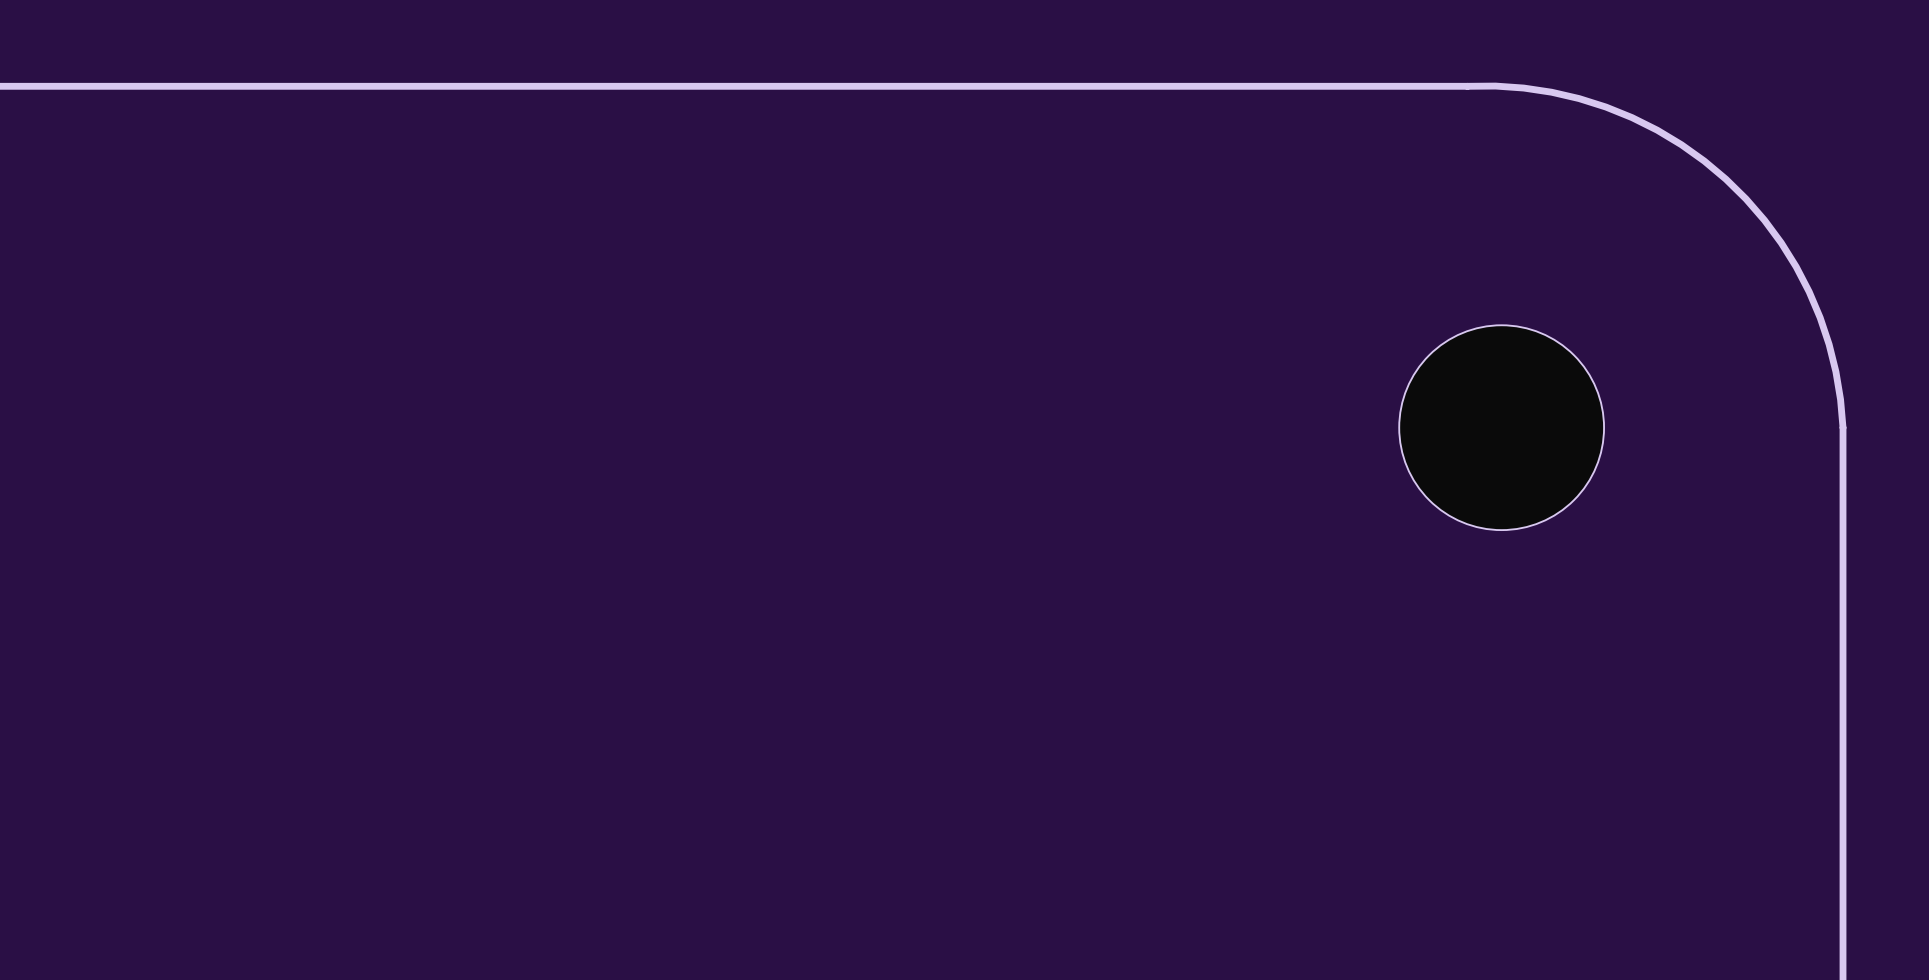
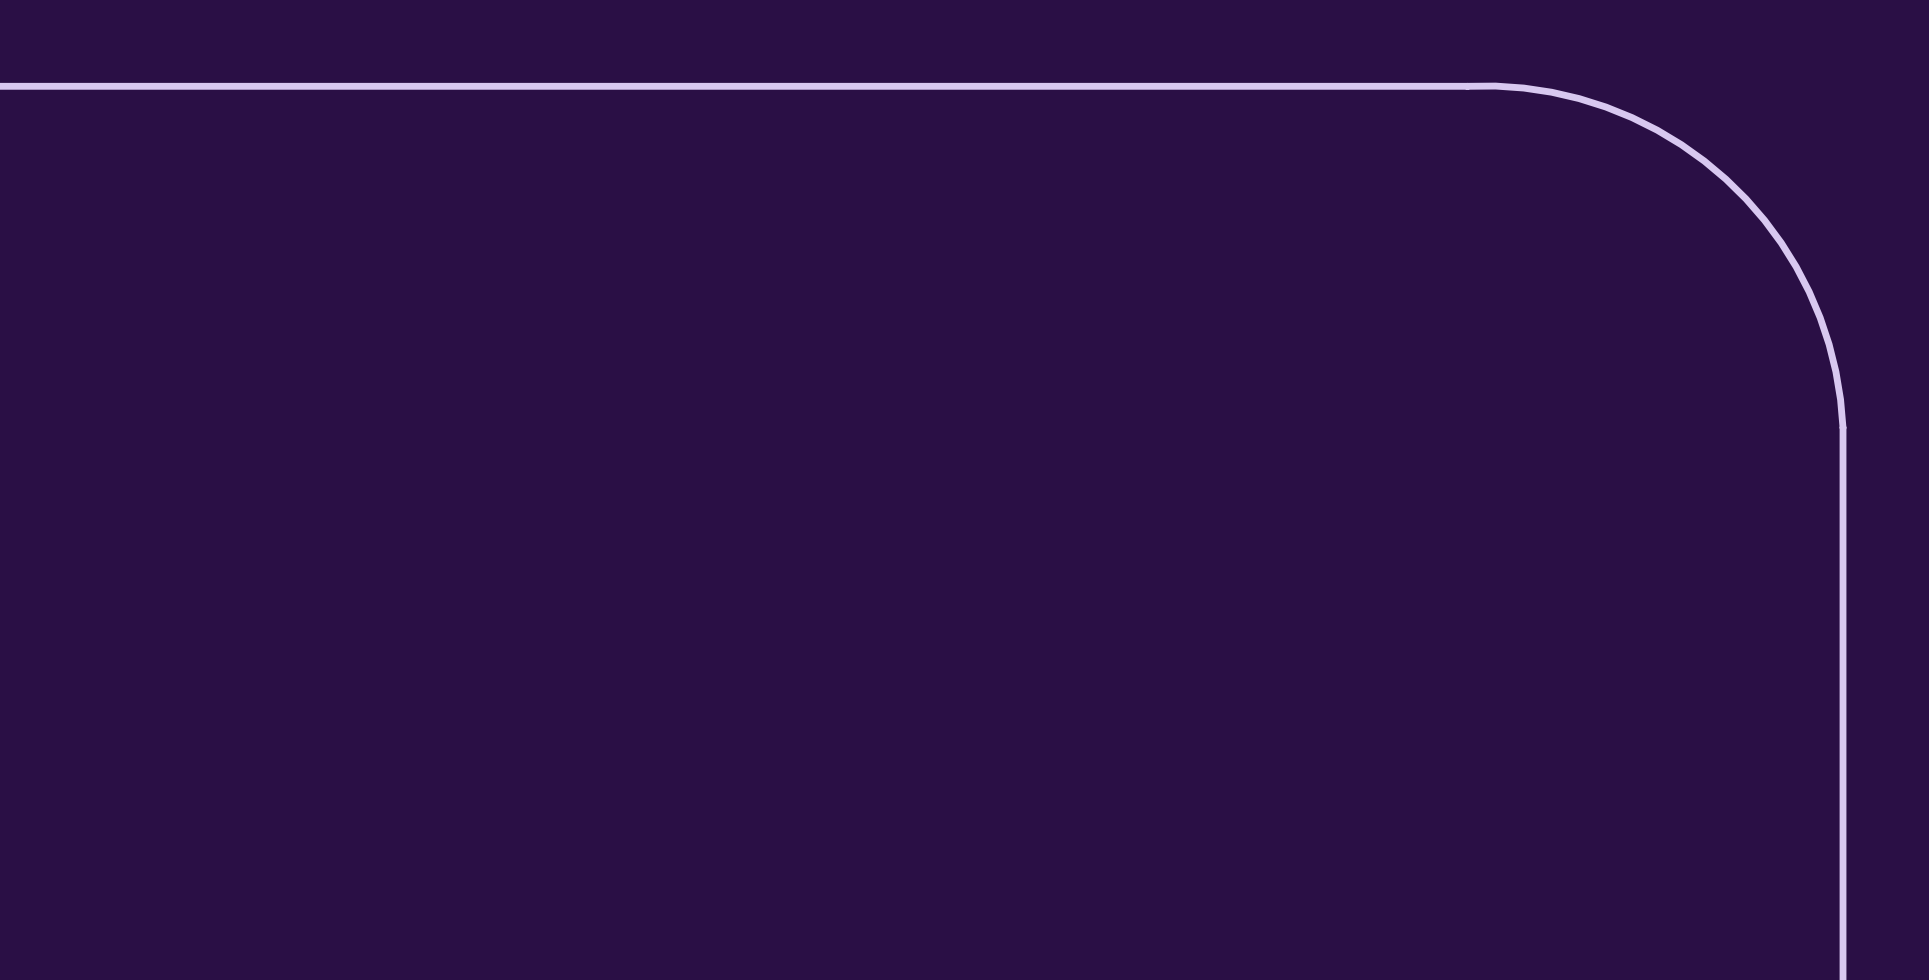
hole: (1501, 427) -> none

